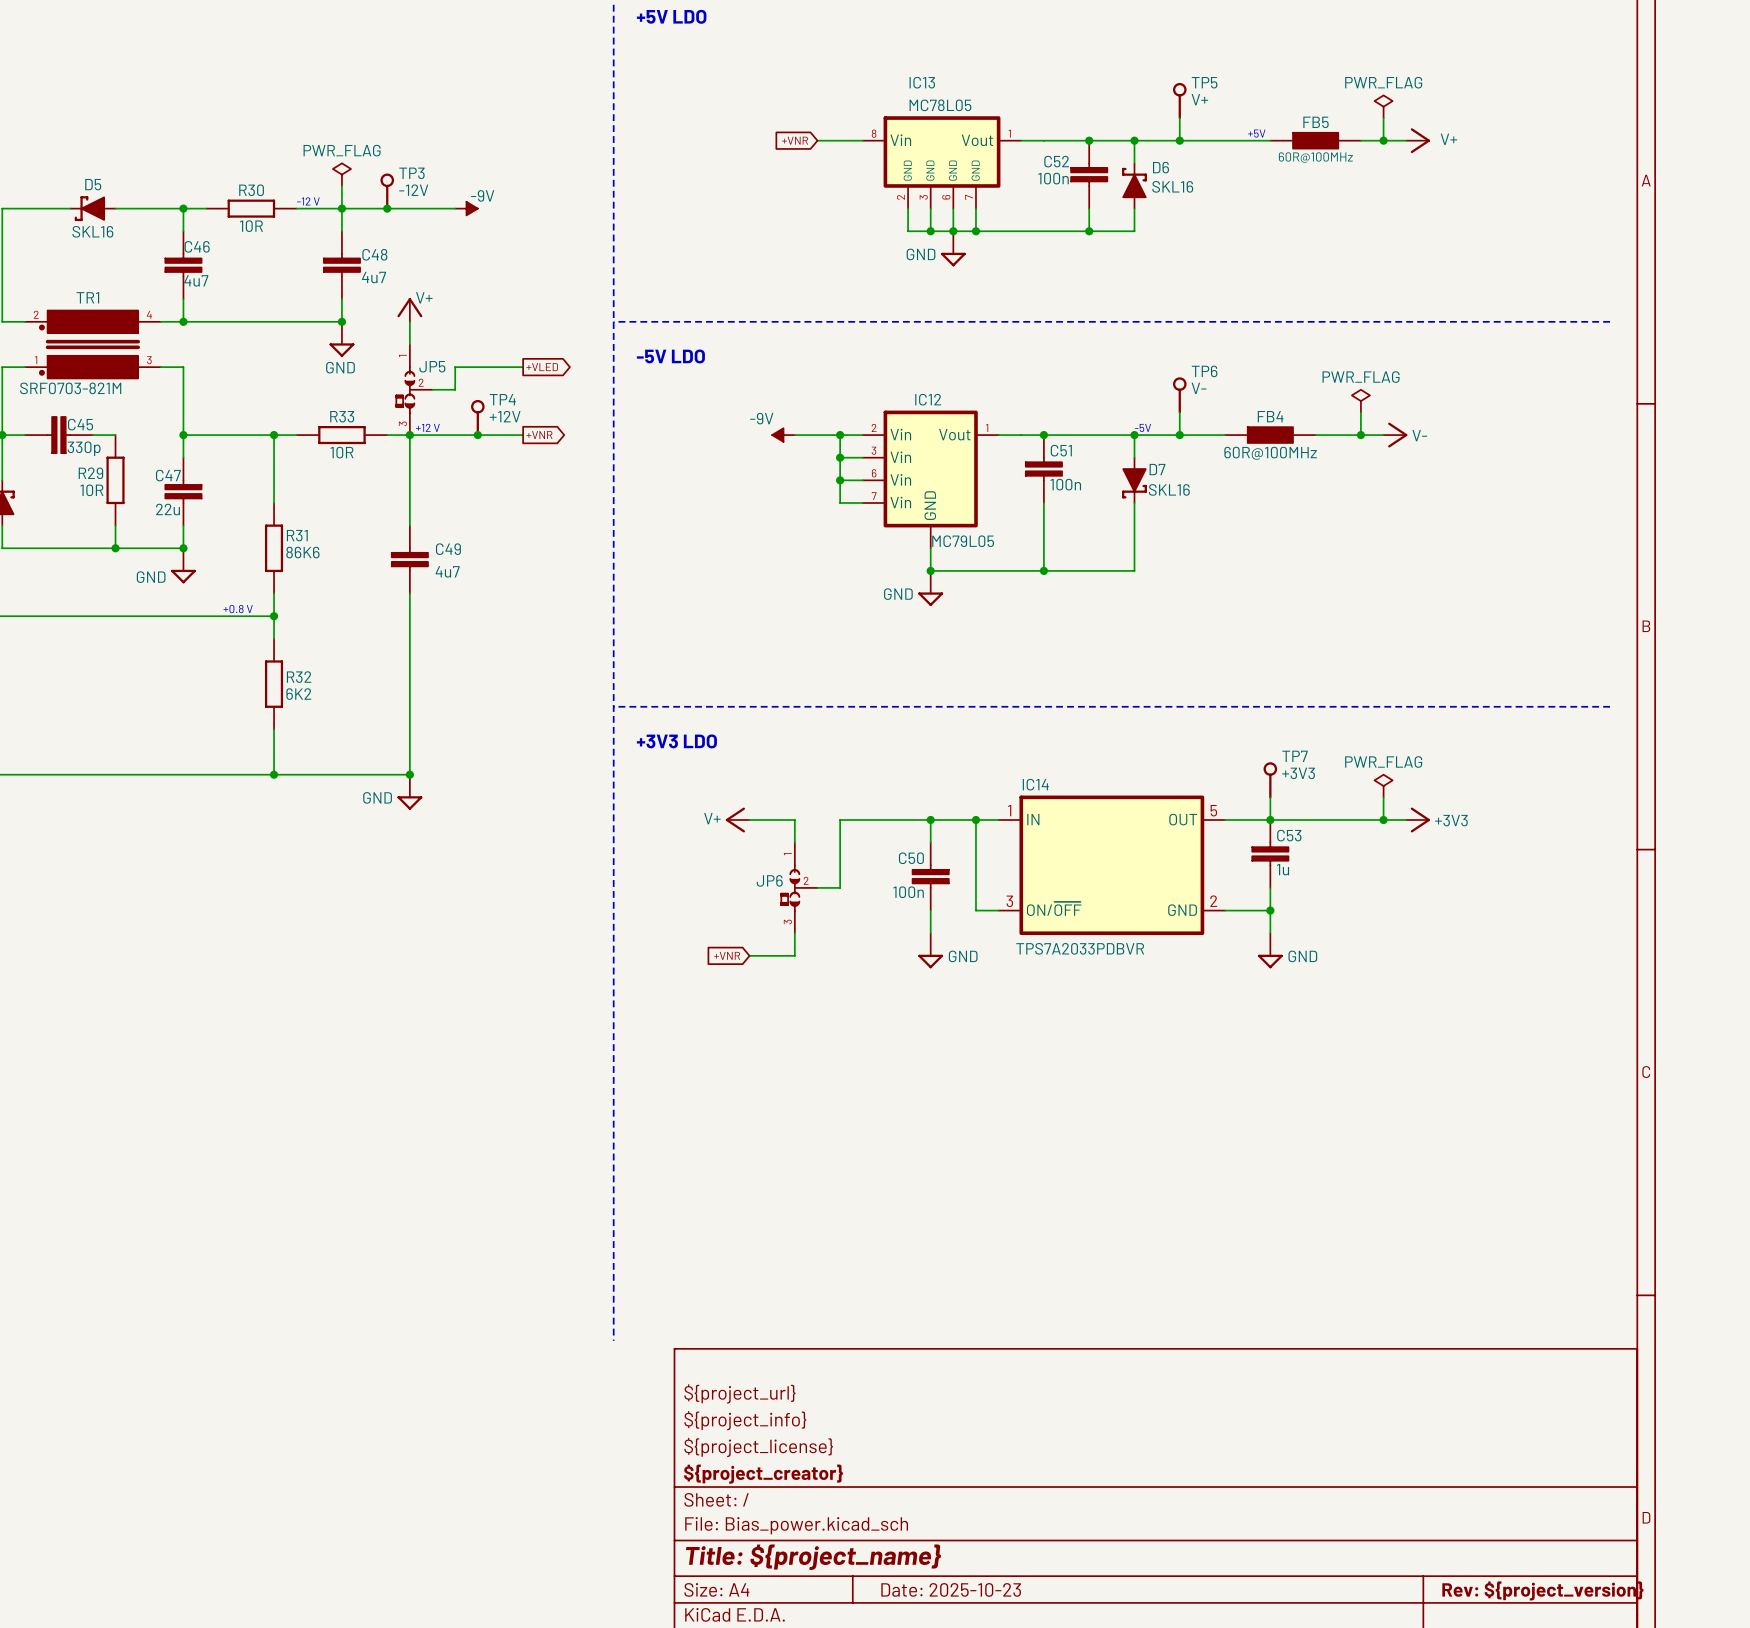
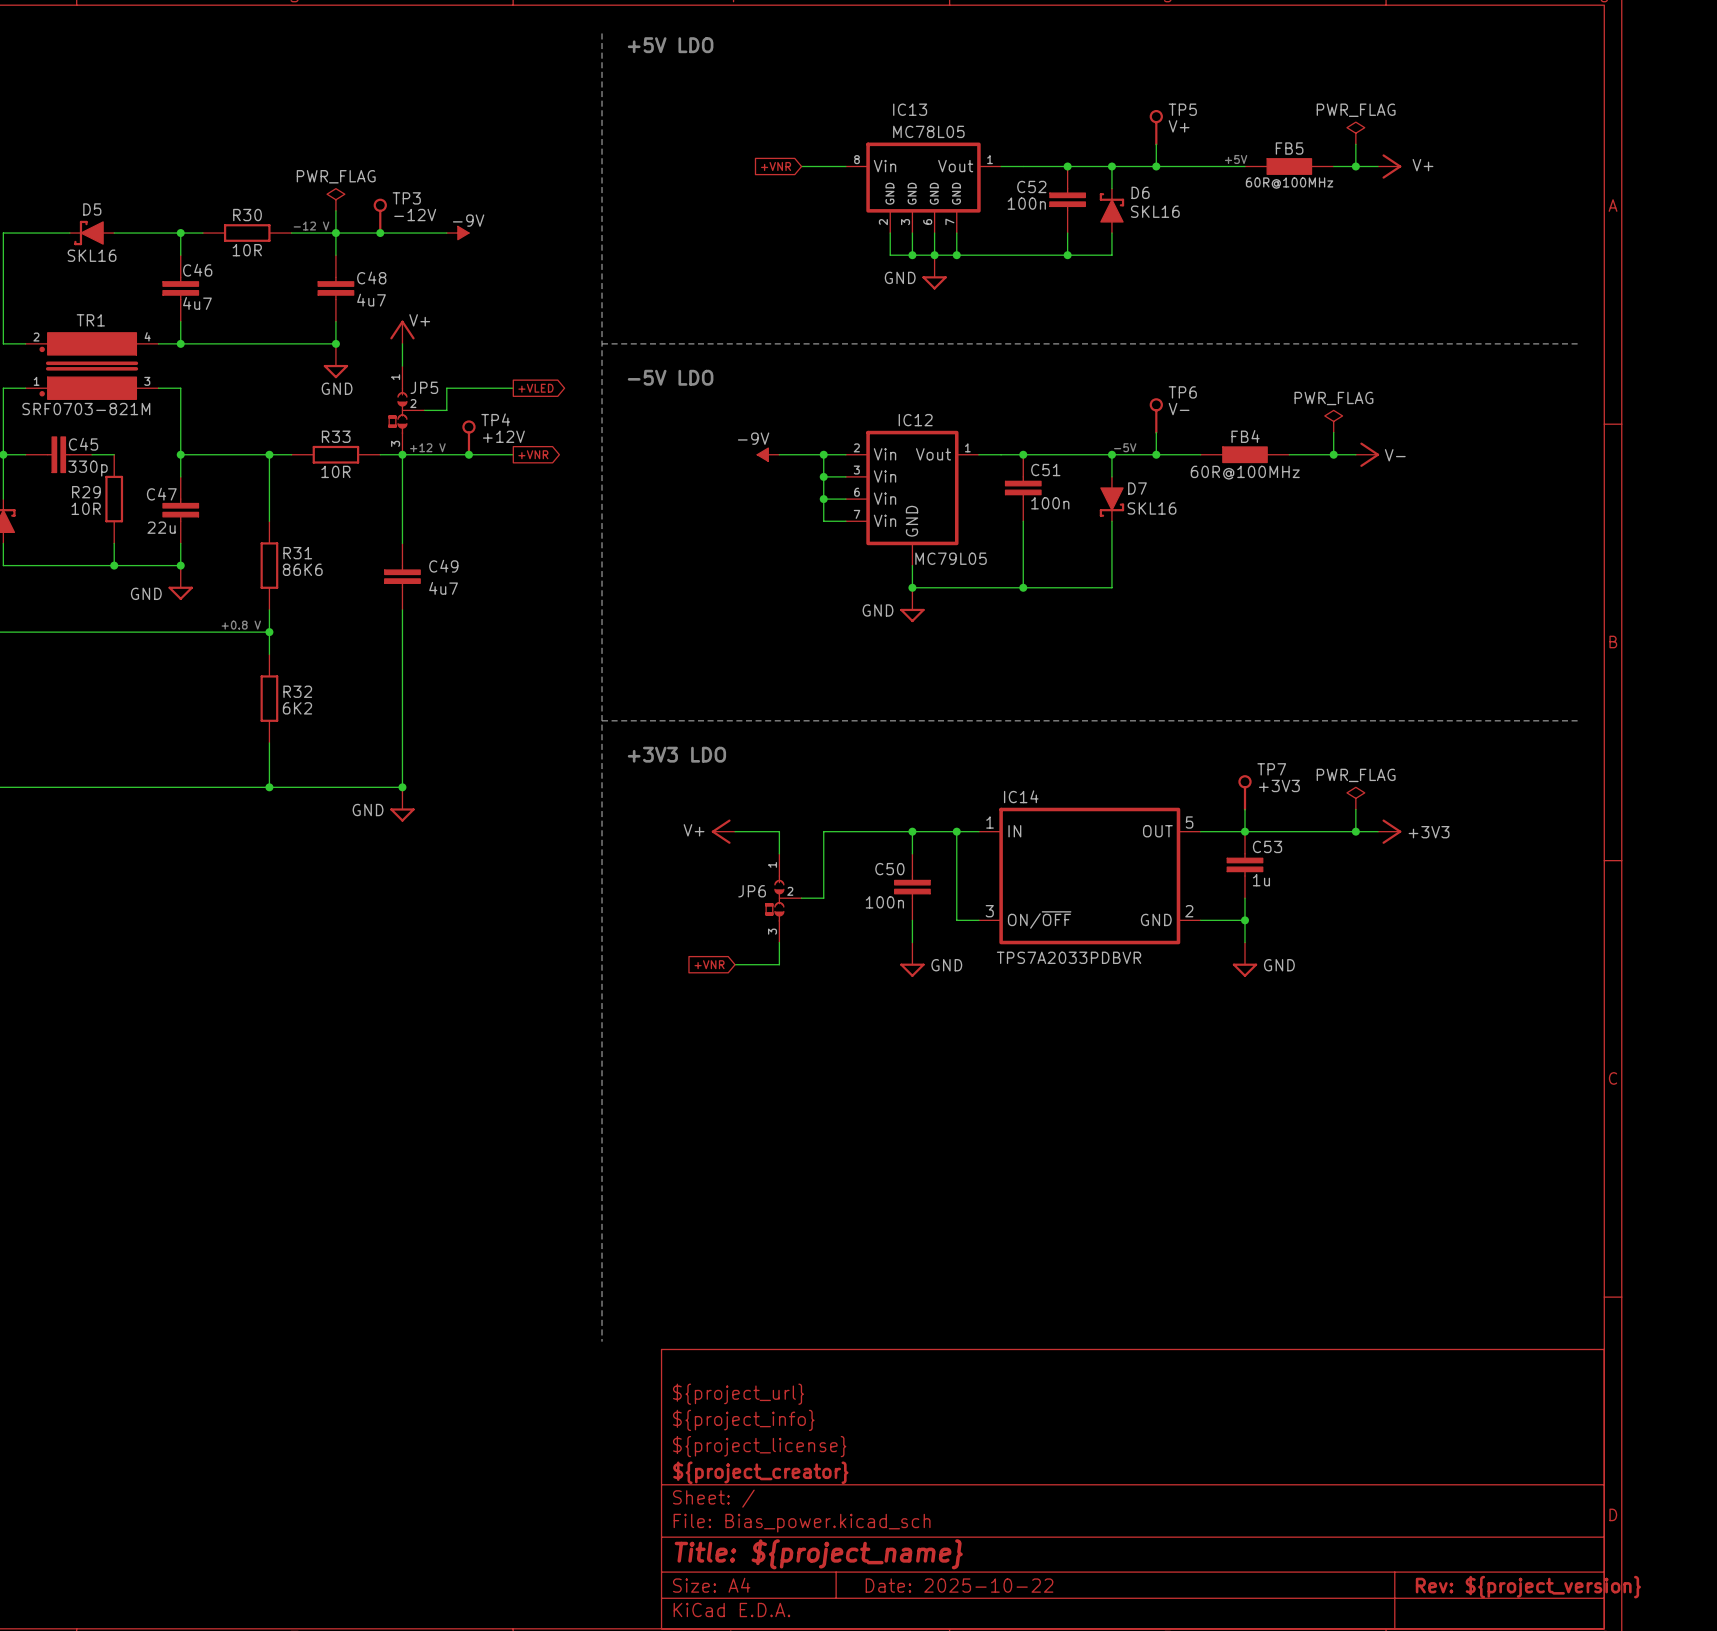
title block: Date: 2025-10-23 (951, 1589) -> Date: 2025-10-22 (959, 1585)

